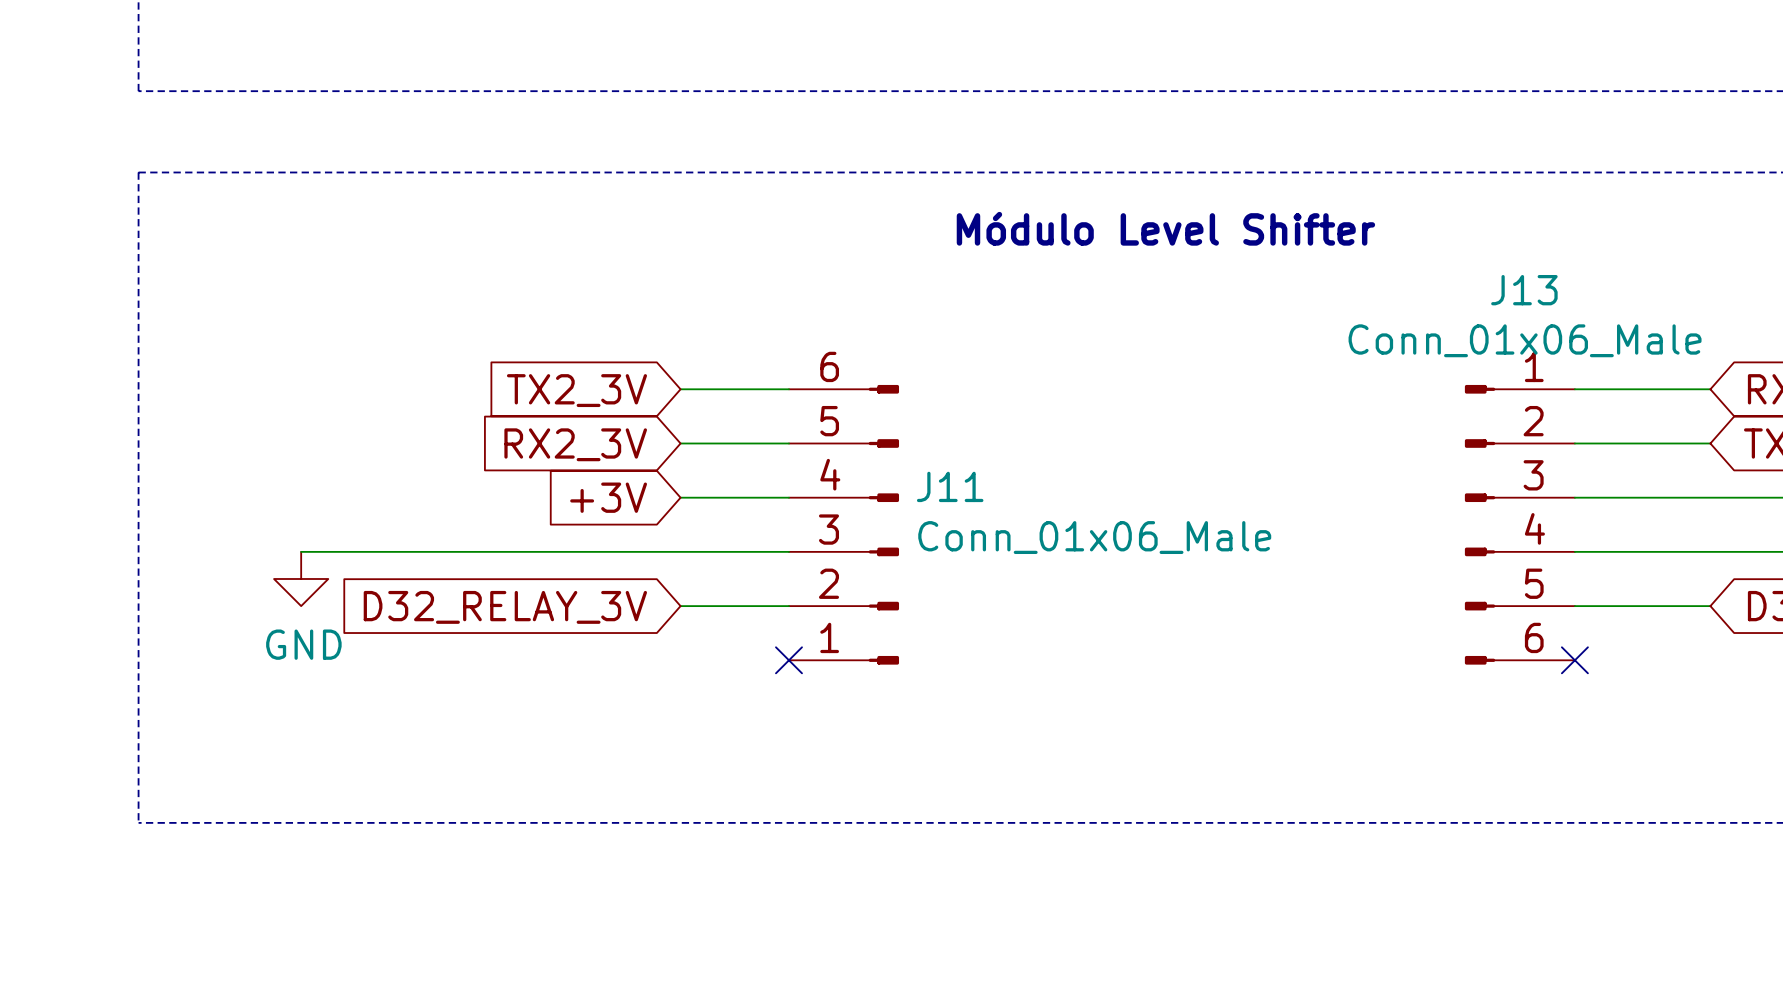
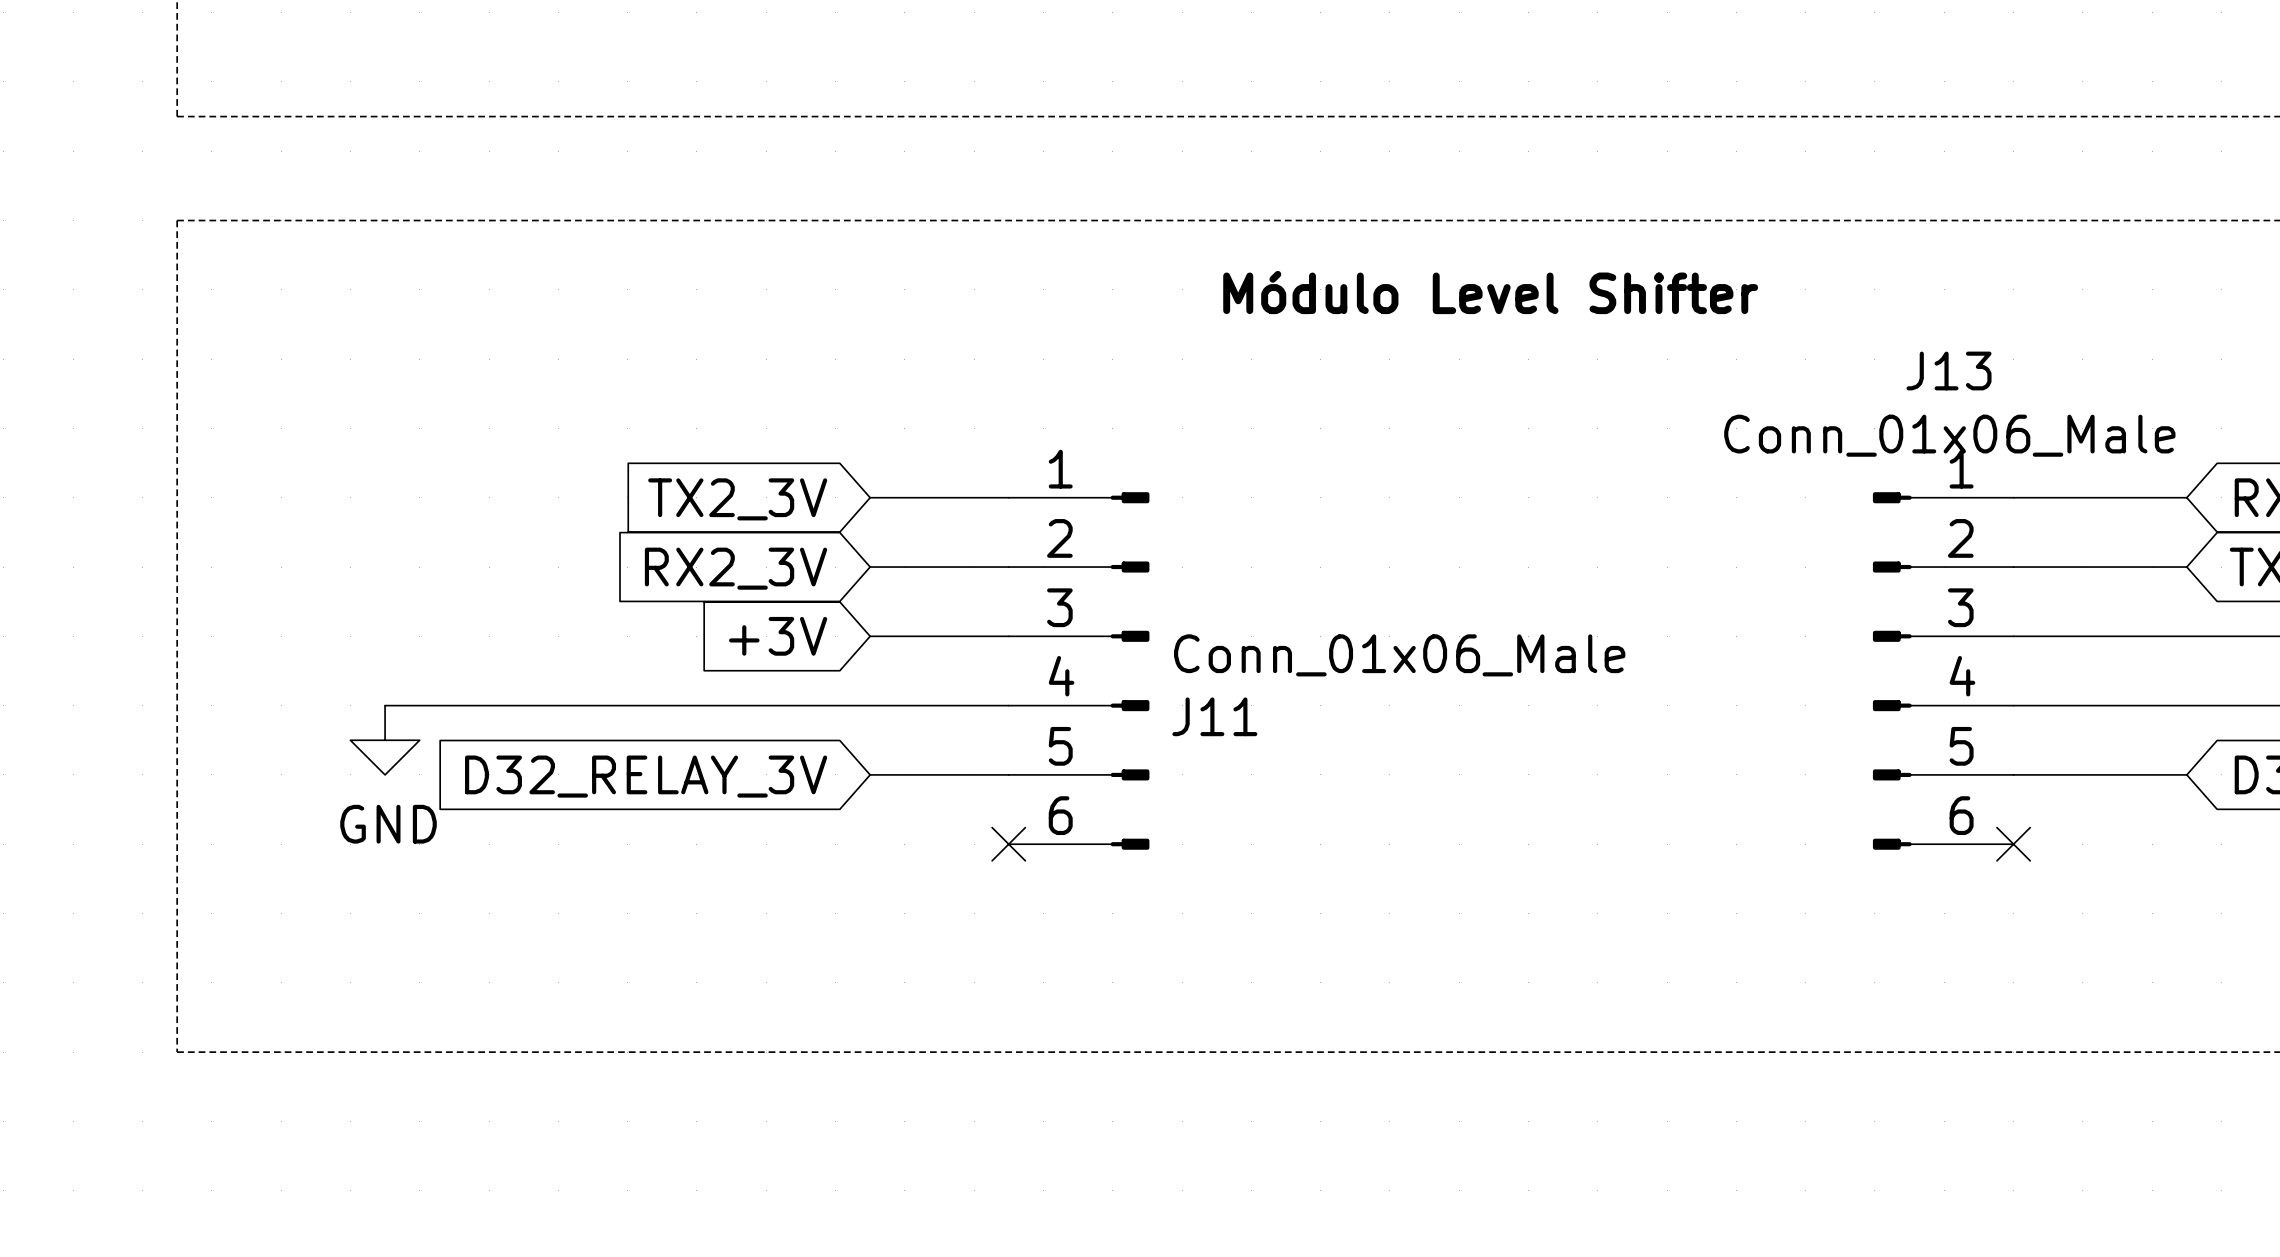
J11 flip: as is (883, 524) -> up-down (1130, 670)

